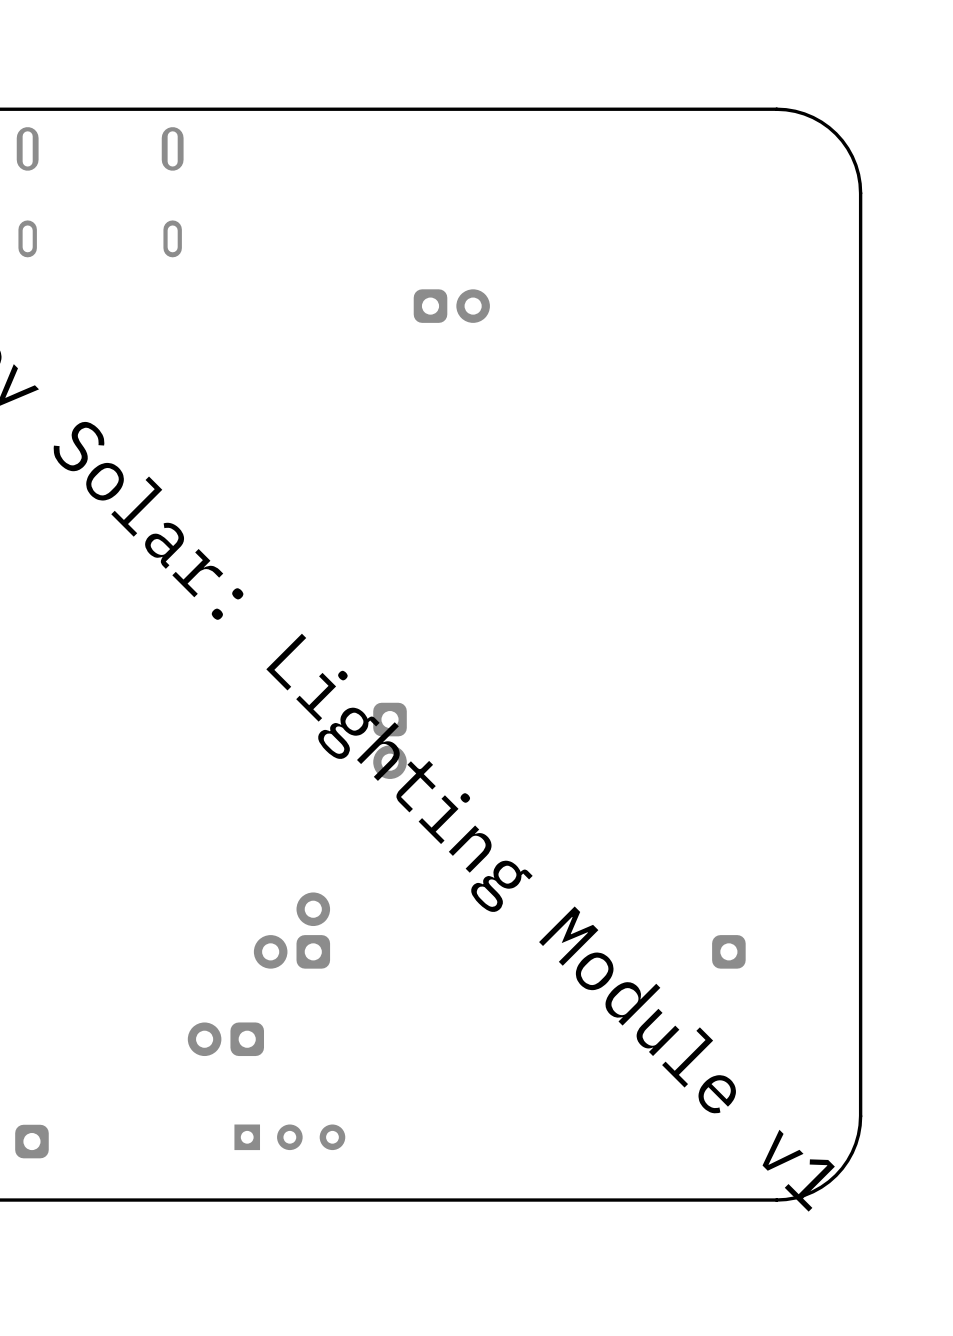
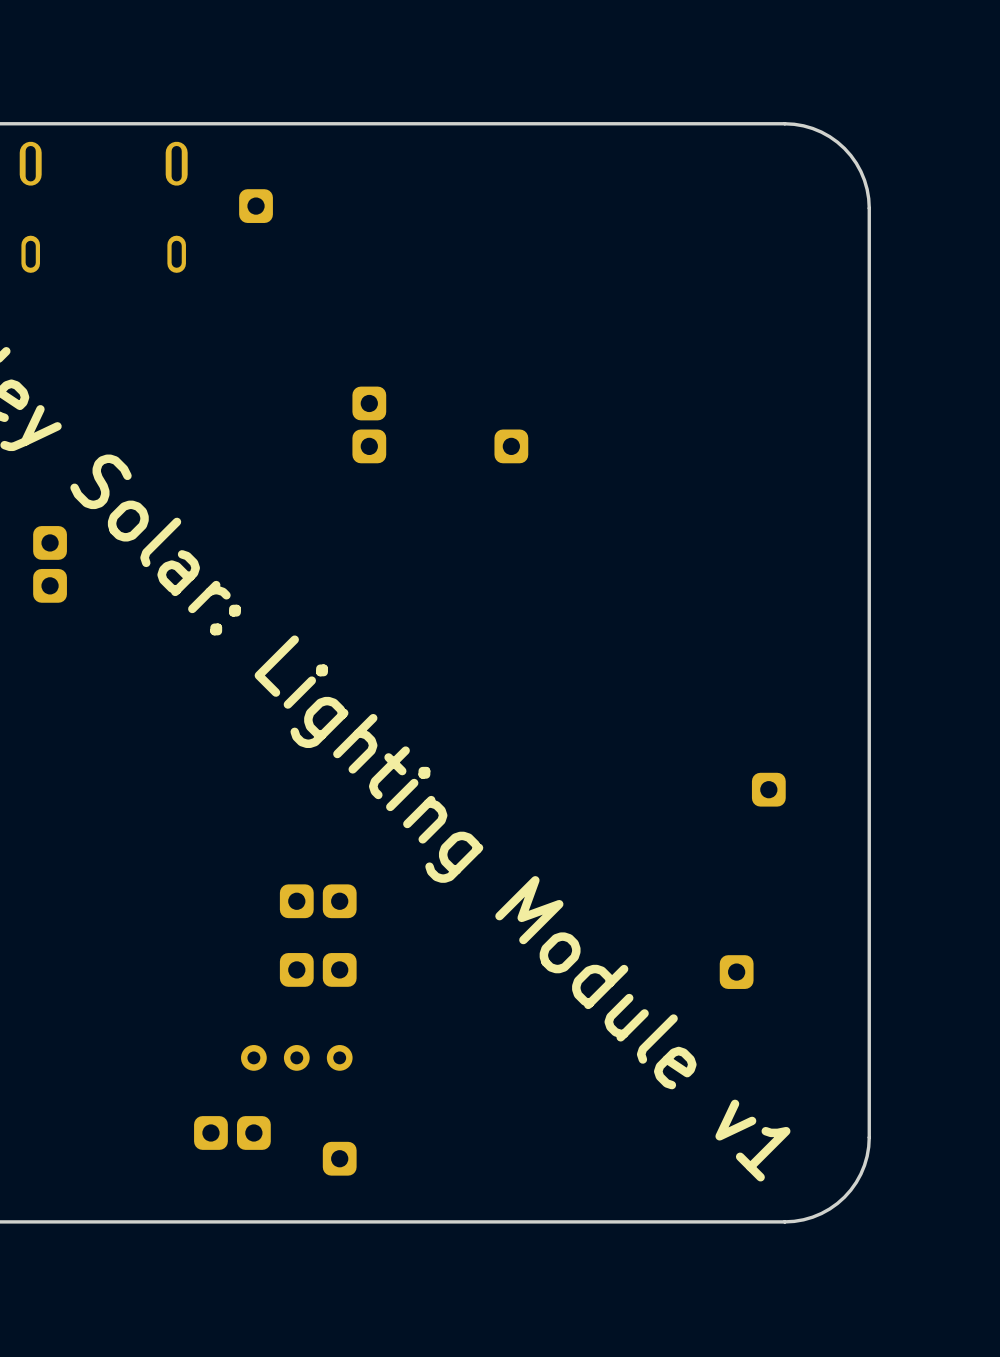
part: none -> (256, 206)
part: (451, 306) -> none
part: none -> (369, 424)
part: none -> (511, 446)
part: none -> (50, 564)
part: (390, 740) -> none
part: none -> (768, 789)
part: none -> (318, 901)
part: (291, 930) -> none
part: none -> (318, 969)
part: none -> (296, 1057)
part: (225, 1039) -> none
part: none -> (232, 1132)
part: (289, 1137) -> none
part position: (31, 1141) -> (339, 1158)

